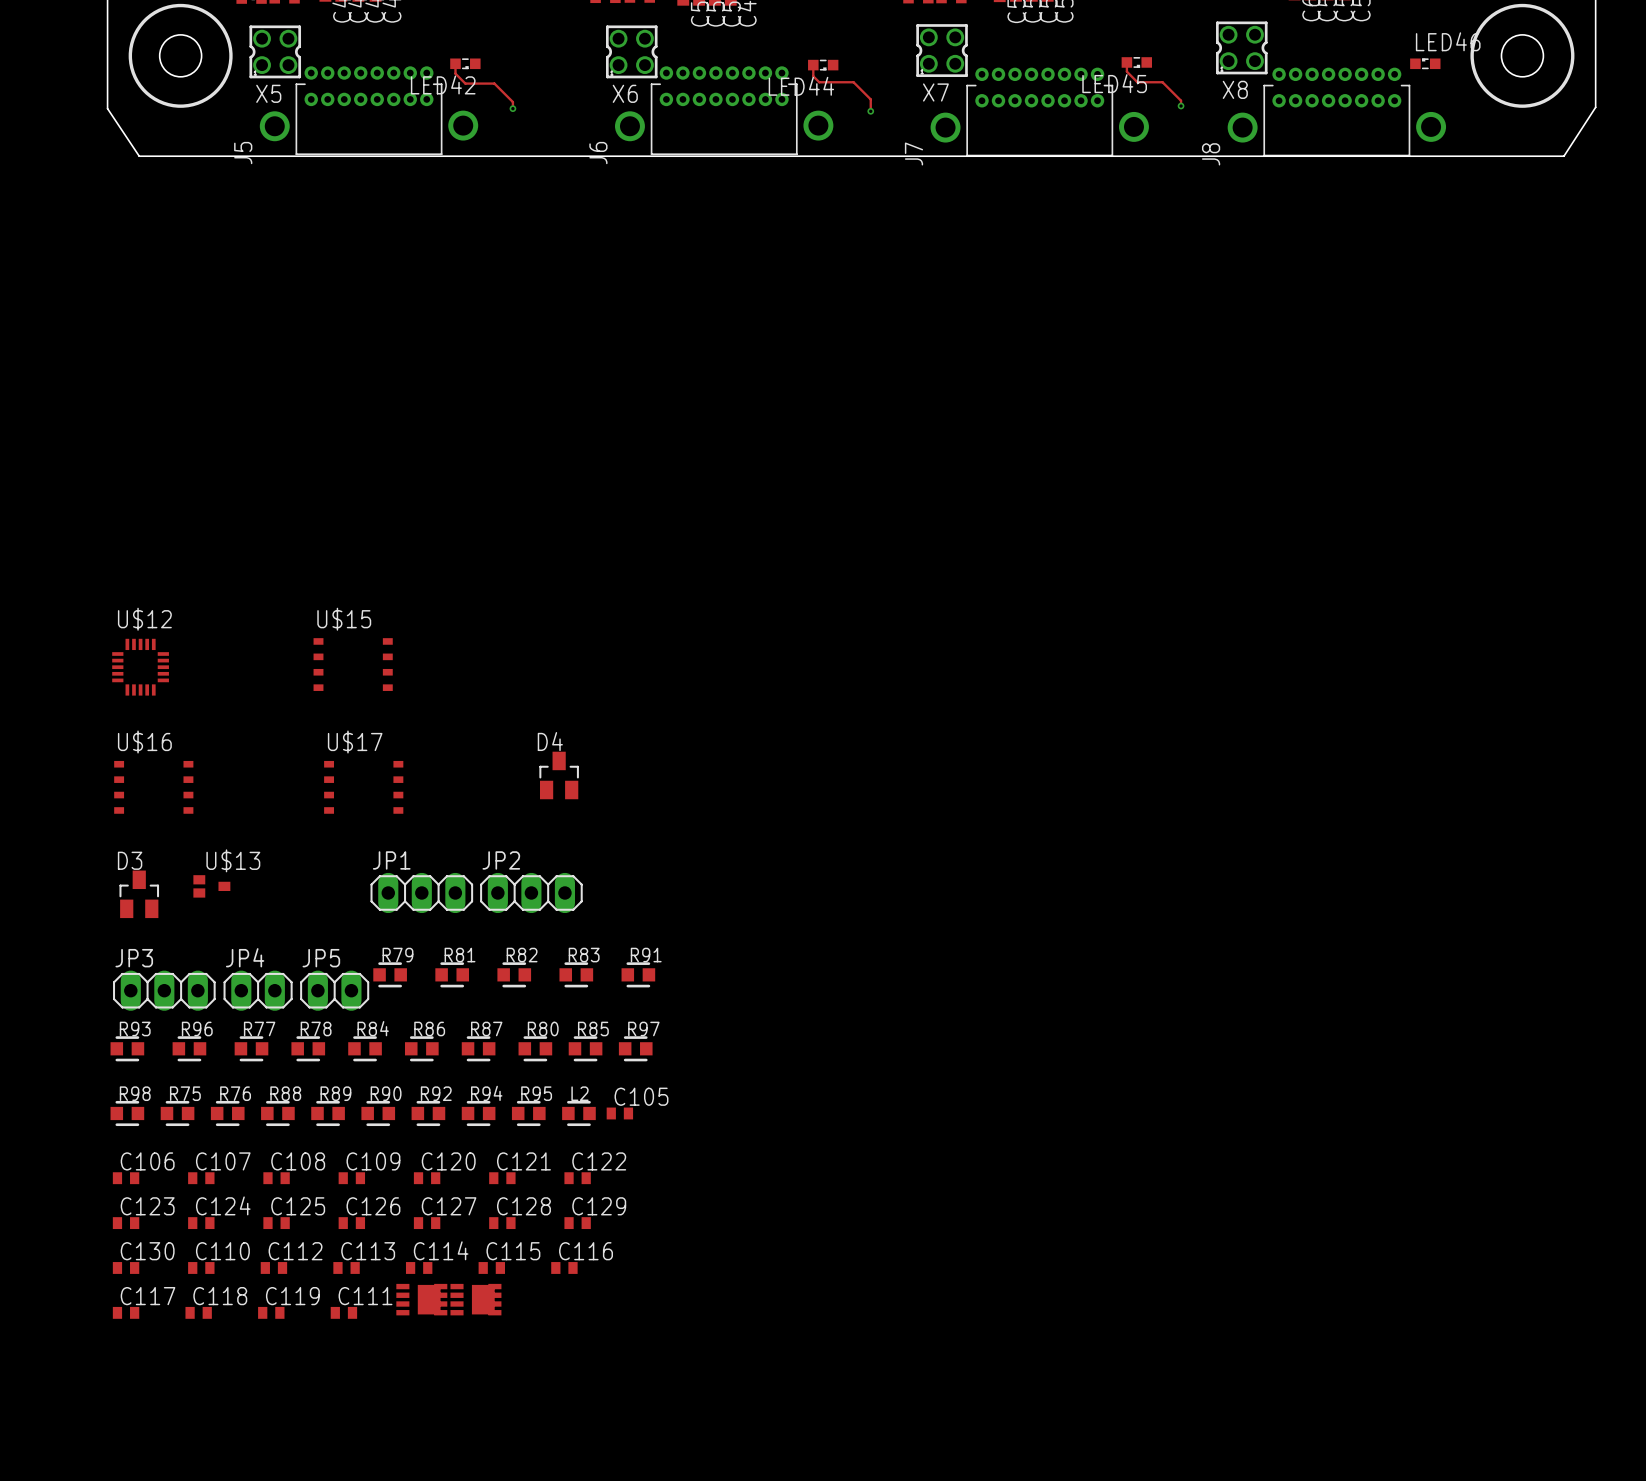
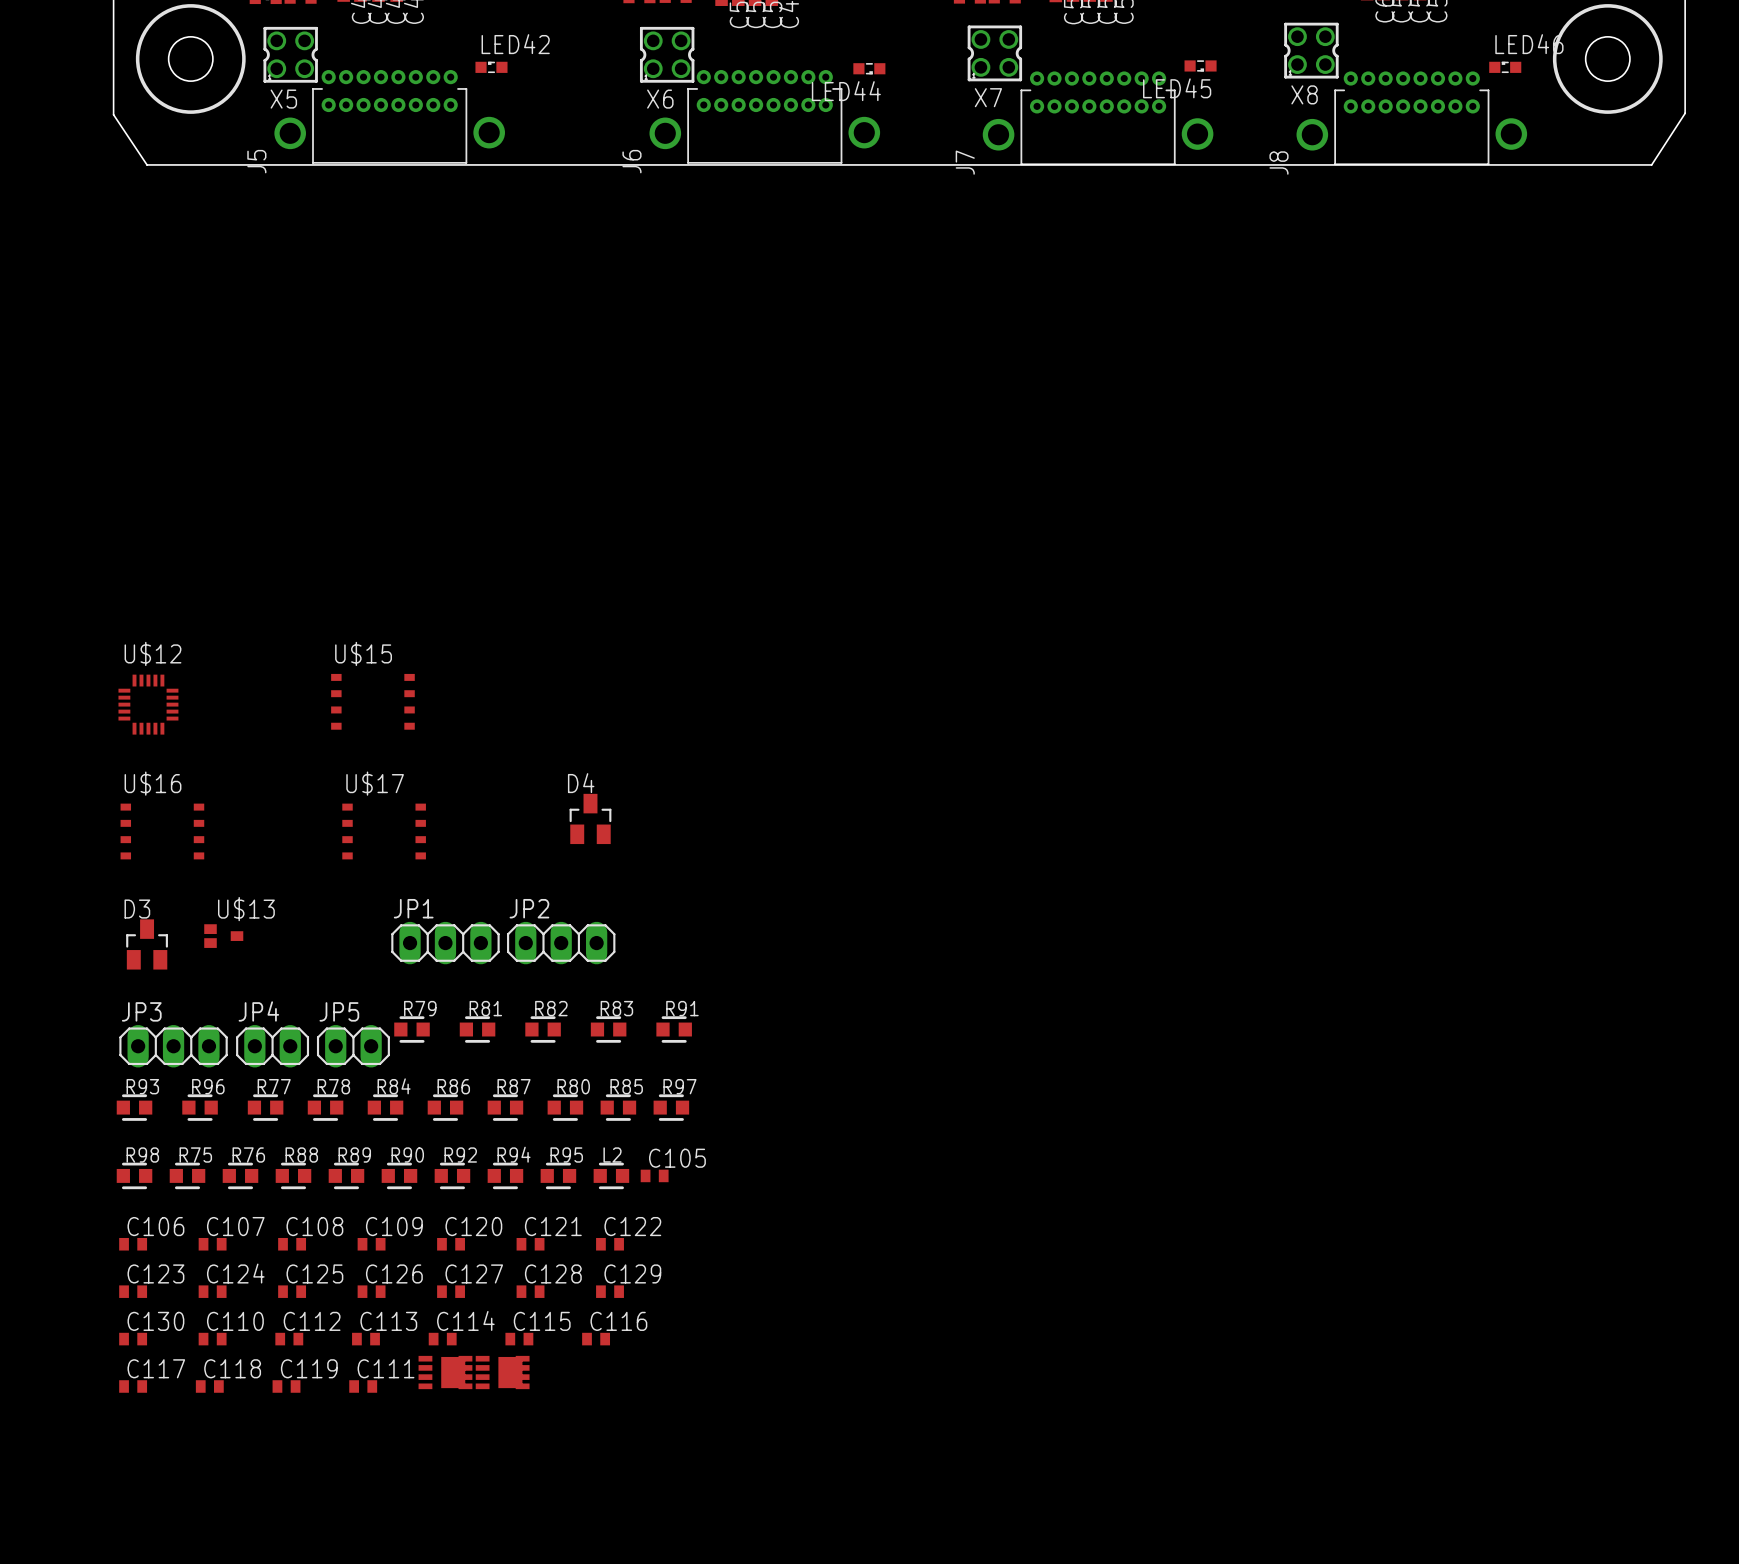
track: (1126, 62) (1126, 71) (1137, 82) (1162, 82) (1181, 100) (1181, 106) -> none
track: (455, 63) (455, 73) (465, 83) (494, 83) (512, 102) (512, 108) -> none
LED42 rotation: 0° (465, 63) -> 180° (491, 67)
track: (813, 65) (813, 76) (819, 82) (853, 82) (870, 99) (870, 111) -> none
via: (1181, 106) -> none
via: (512, 108) -> none
via: (870, 111) -> none

